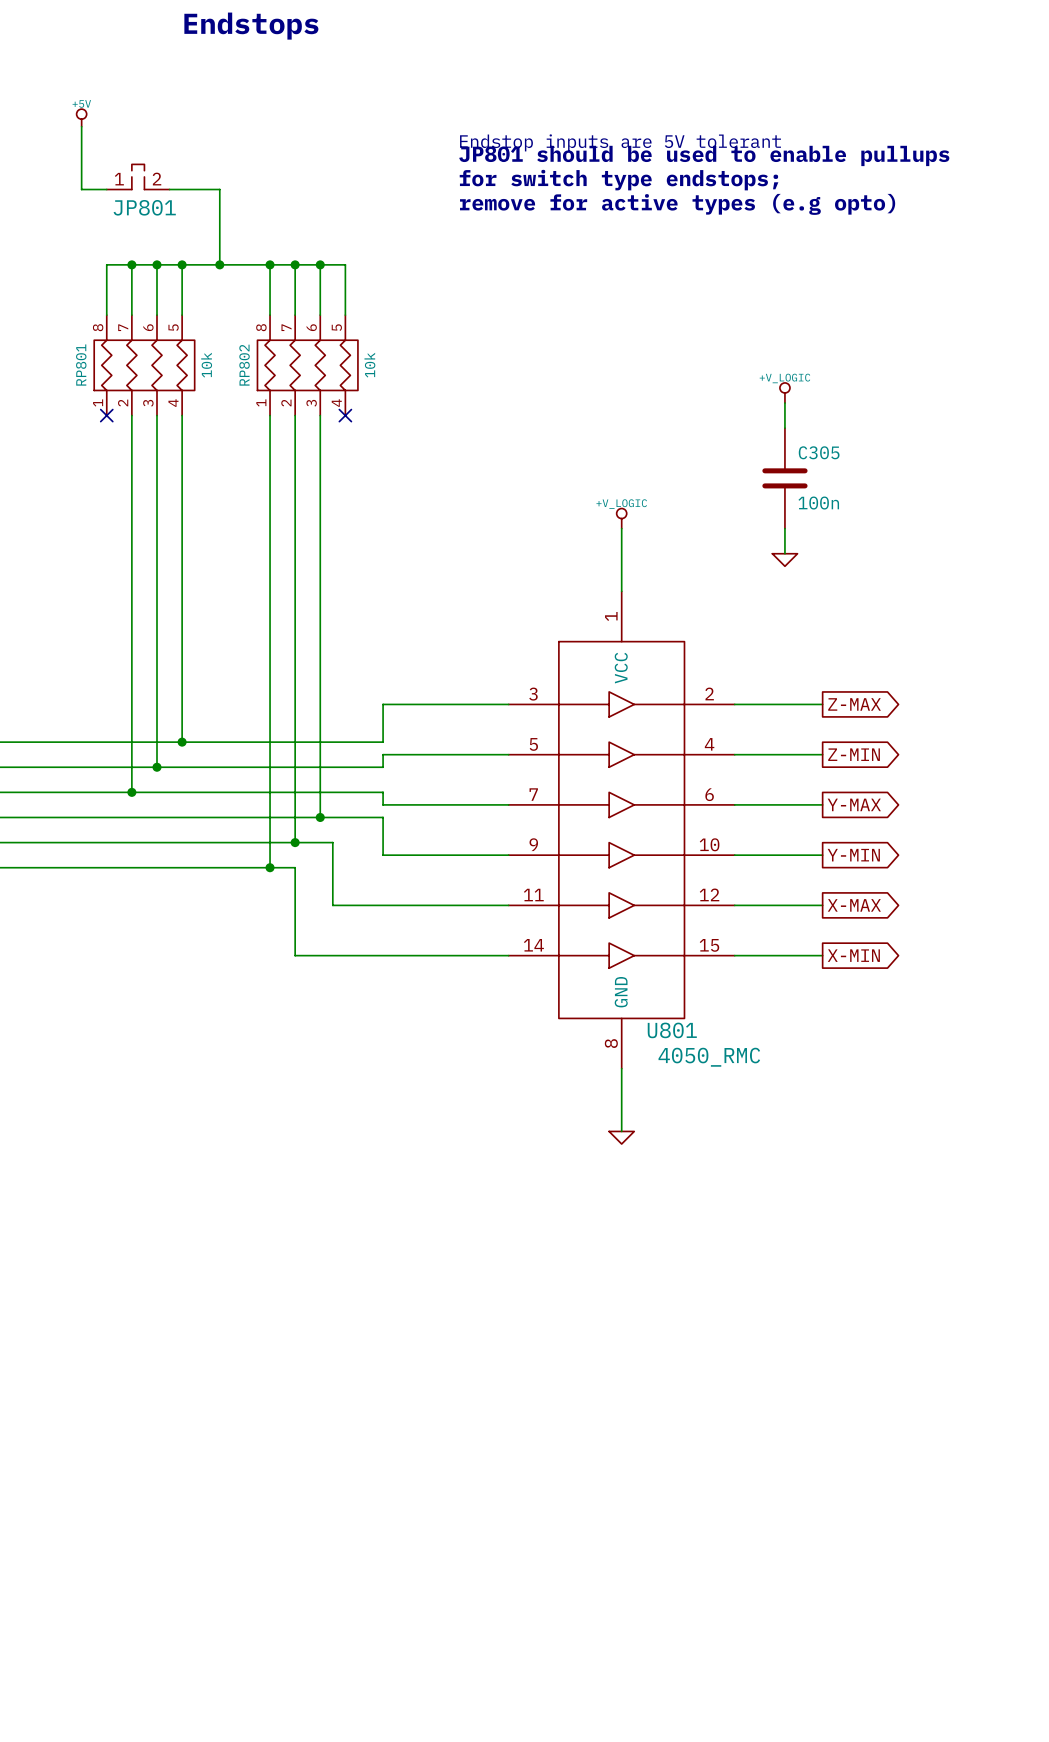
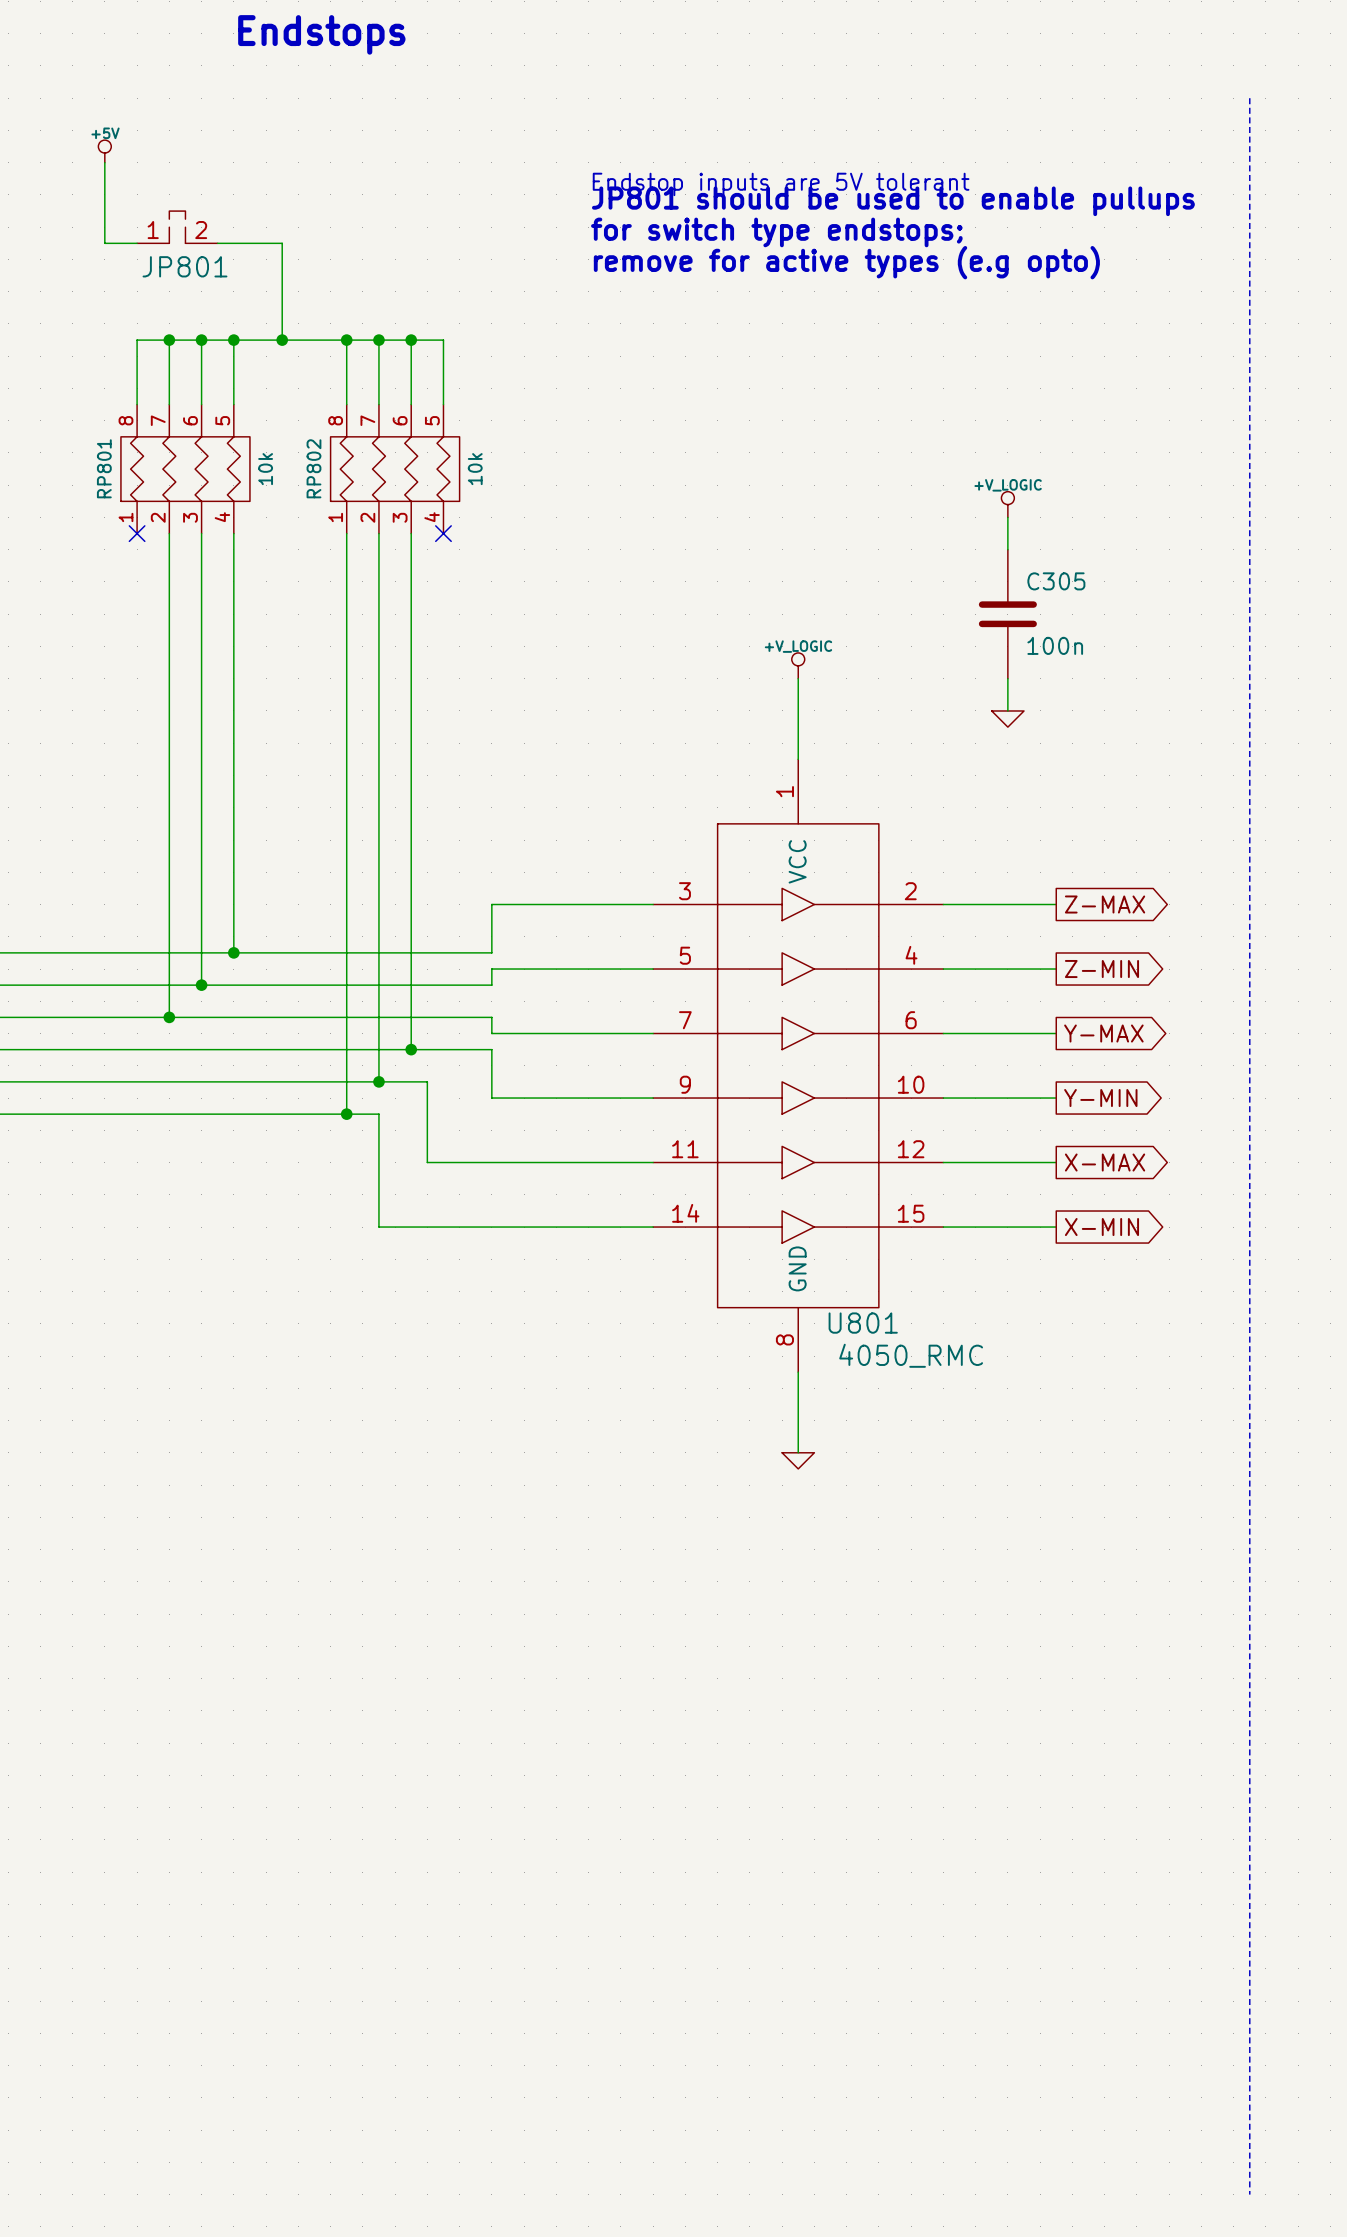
line: none -> (1249, 98) (1249, 2194)

